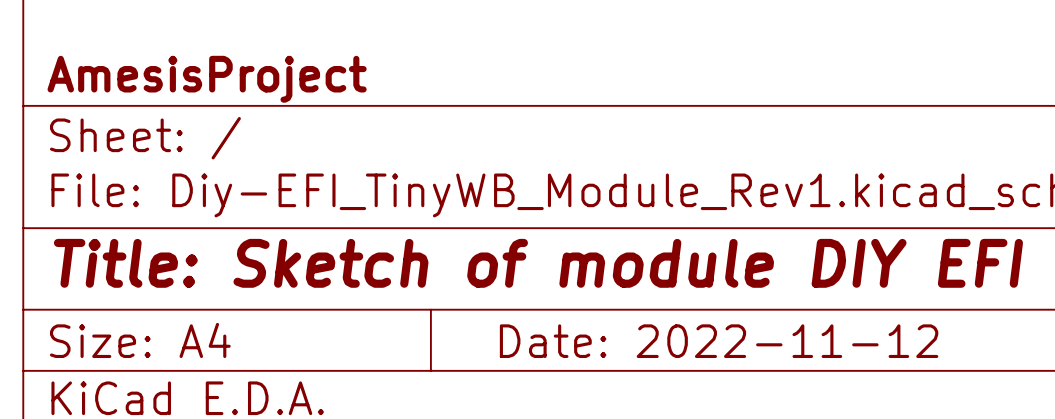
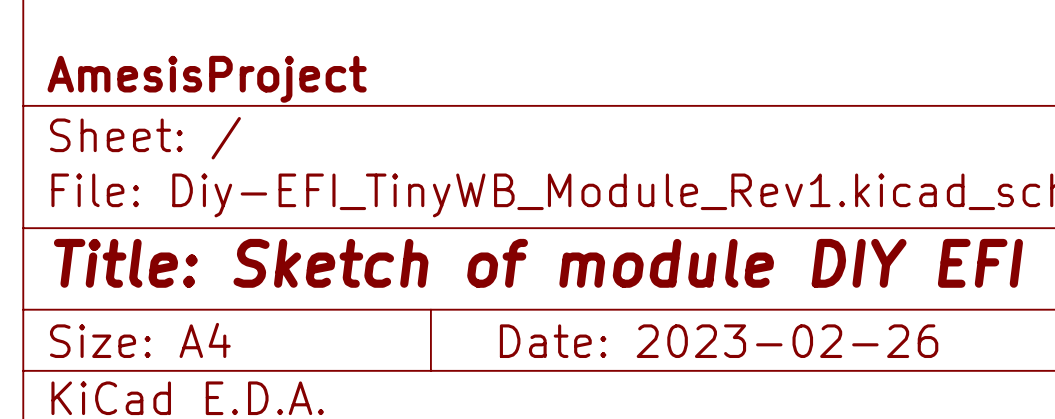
title block: Date: 2022-11-12 (719, 341) -> Date: 2023-02-26 (719, 341)

